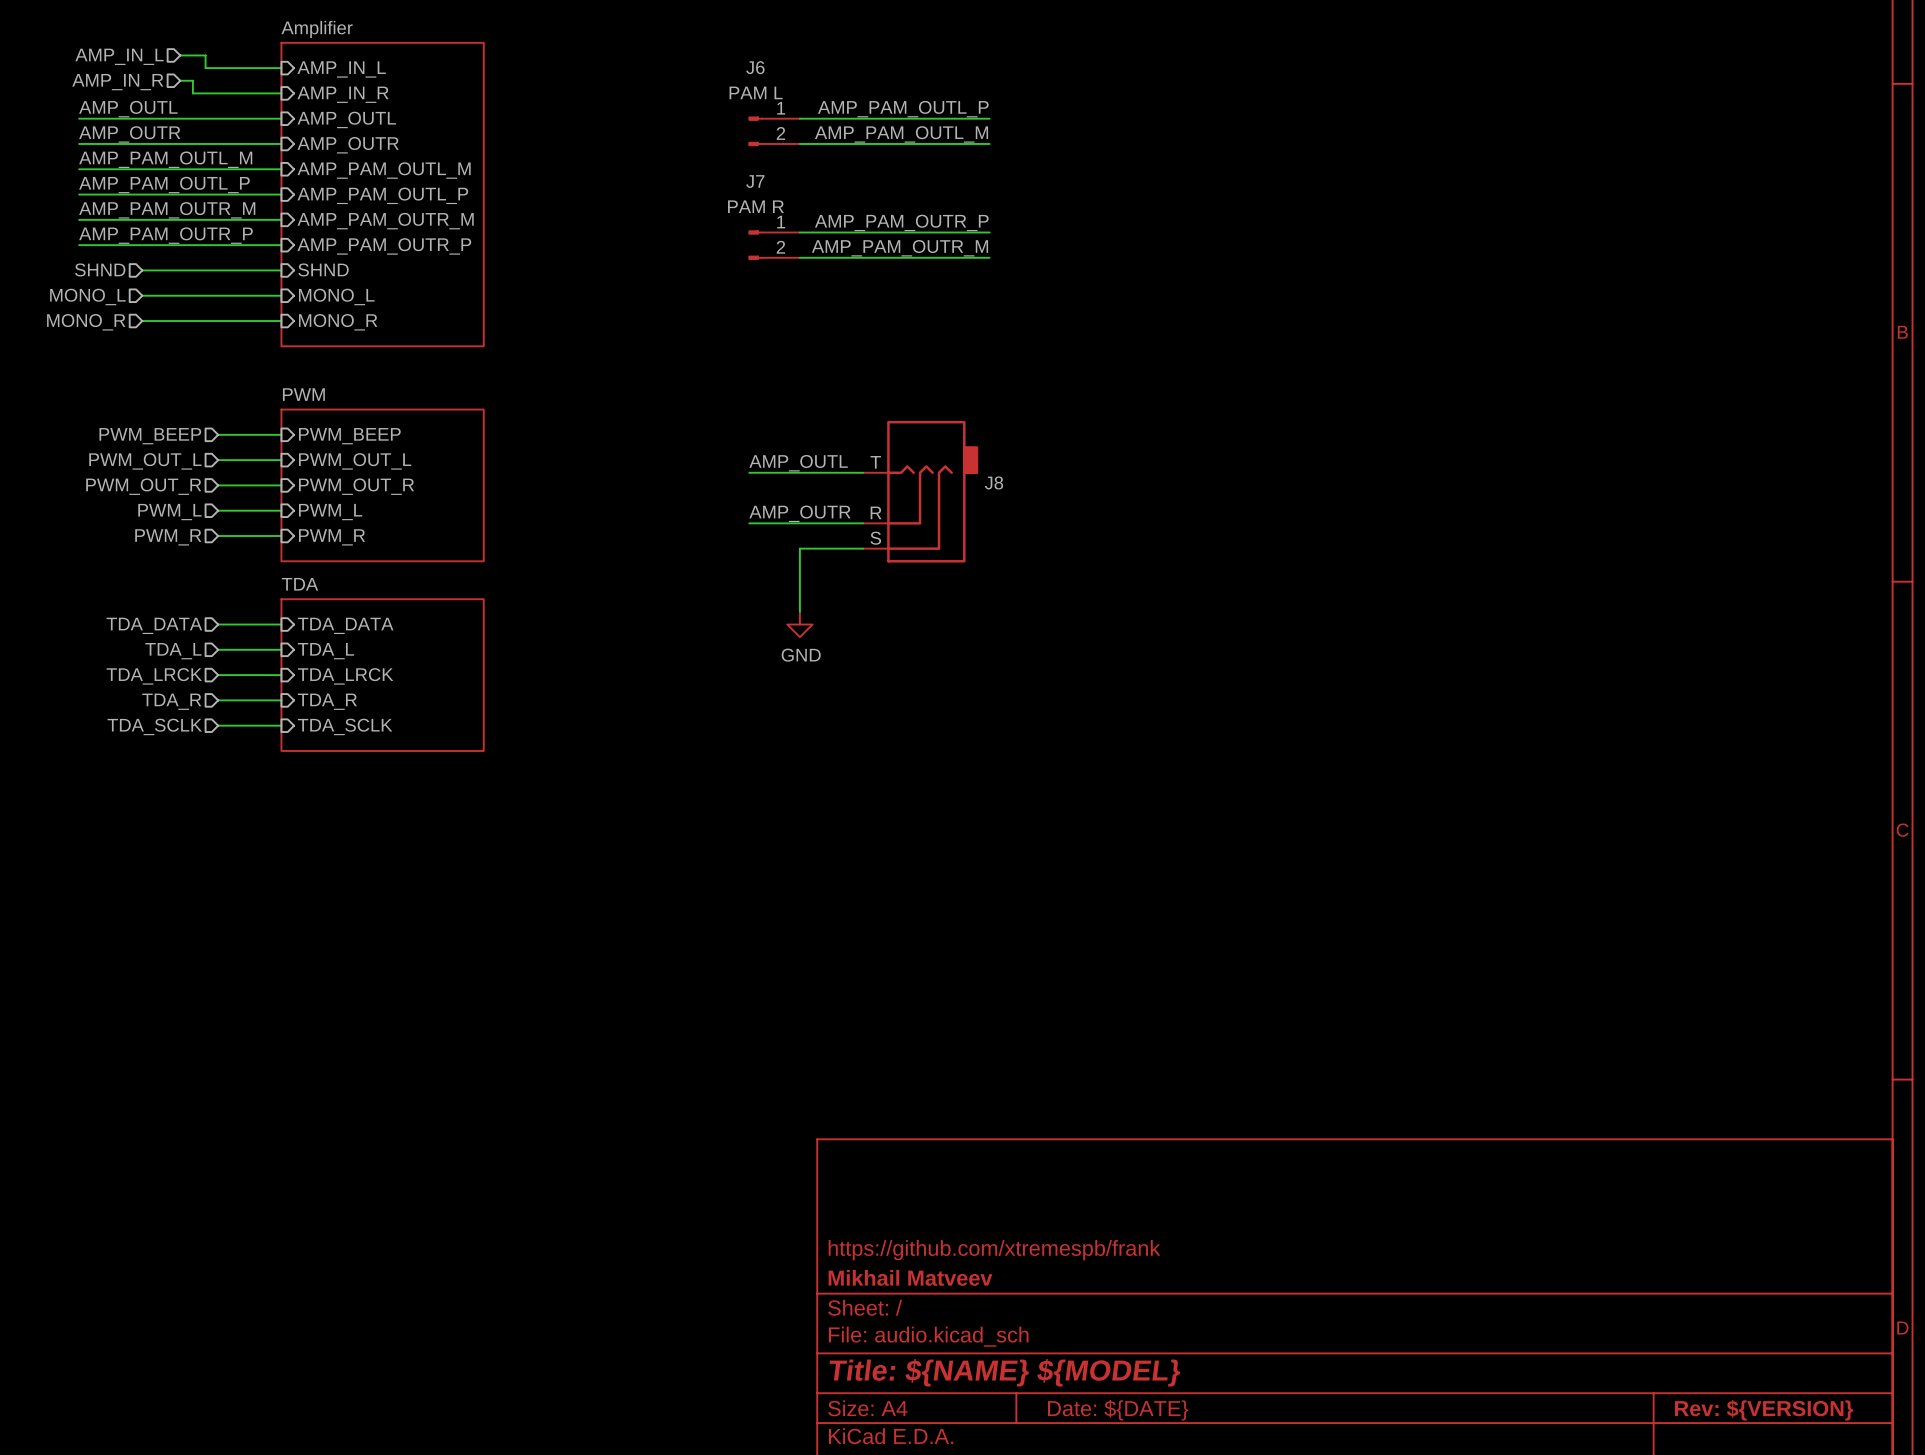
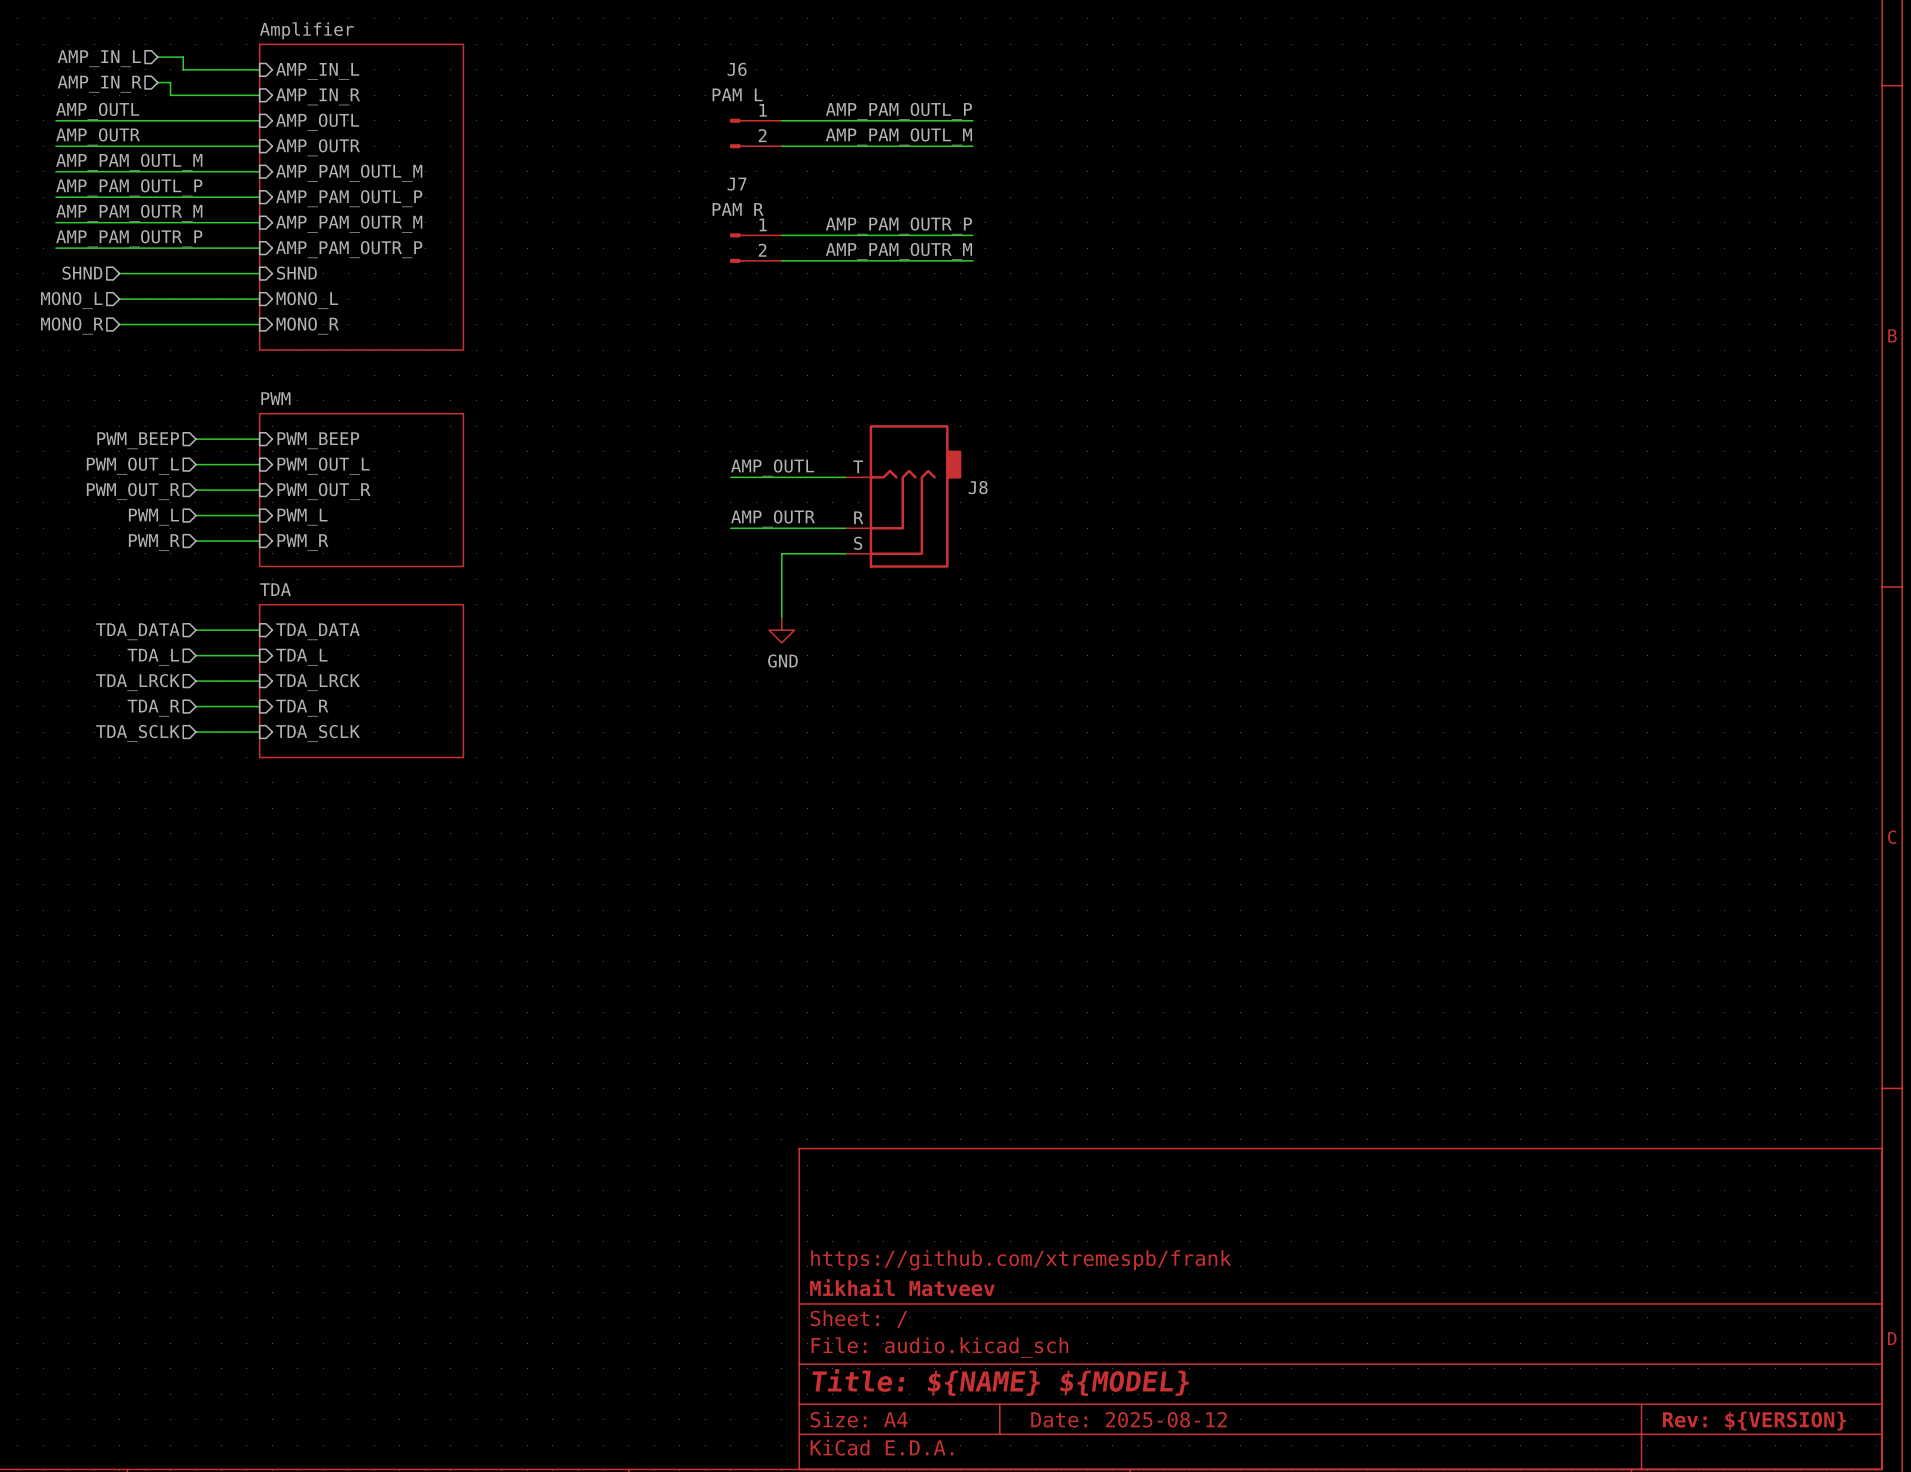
title block: Date: ${DATE} (1118, 1410) -> Date: 2025-08-12 (1129, 1419)

